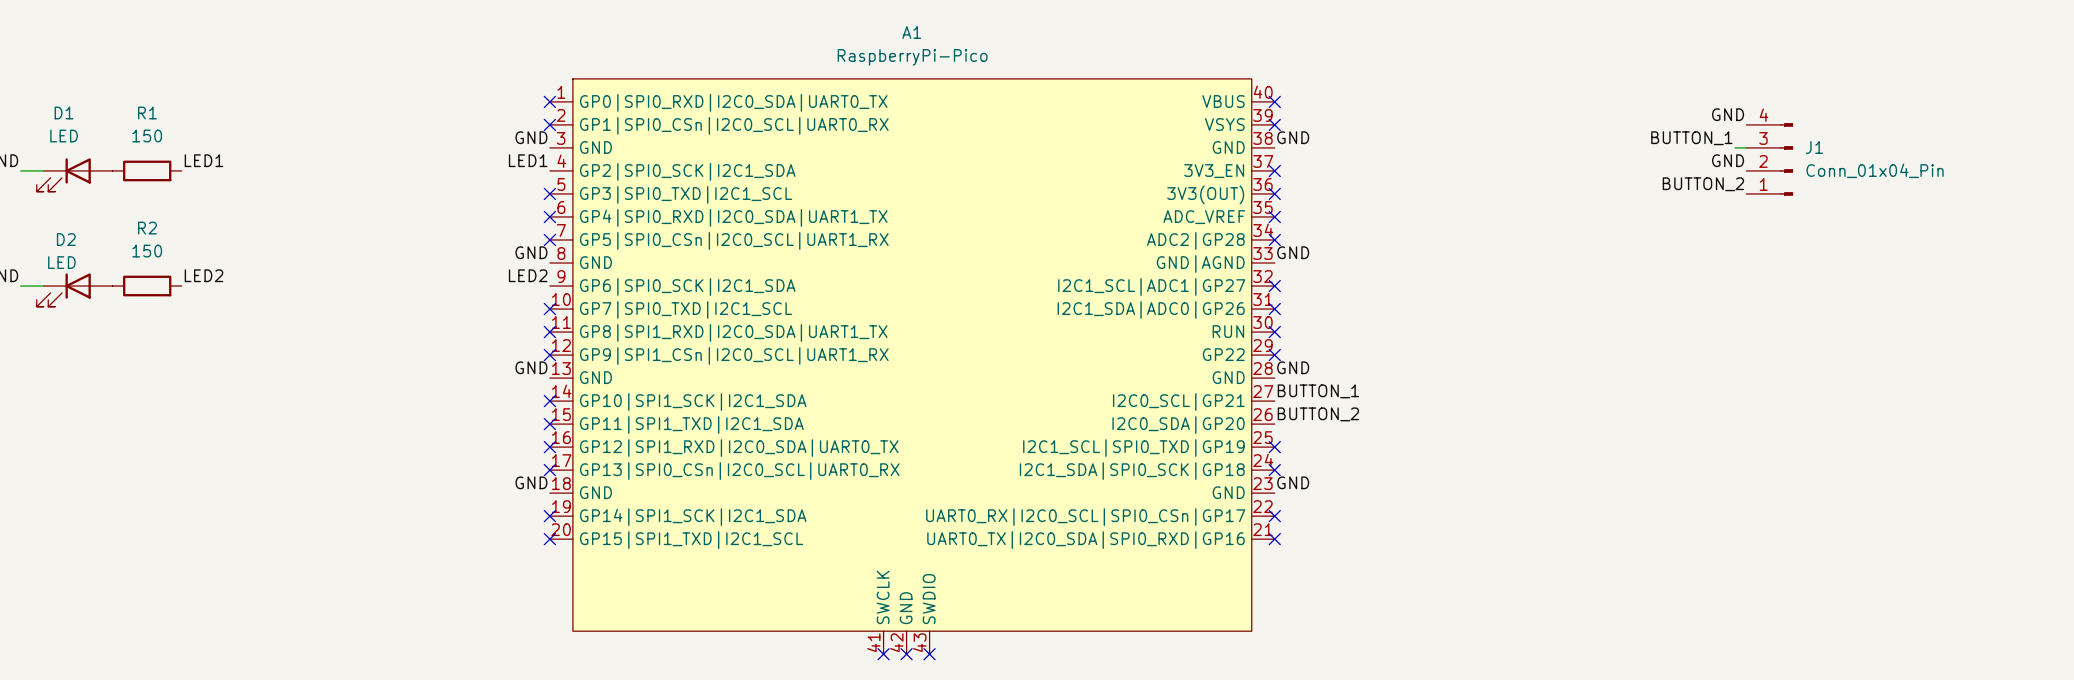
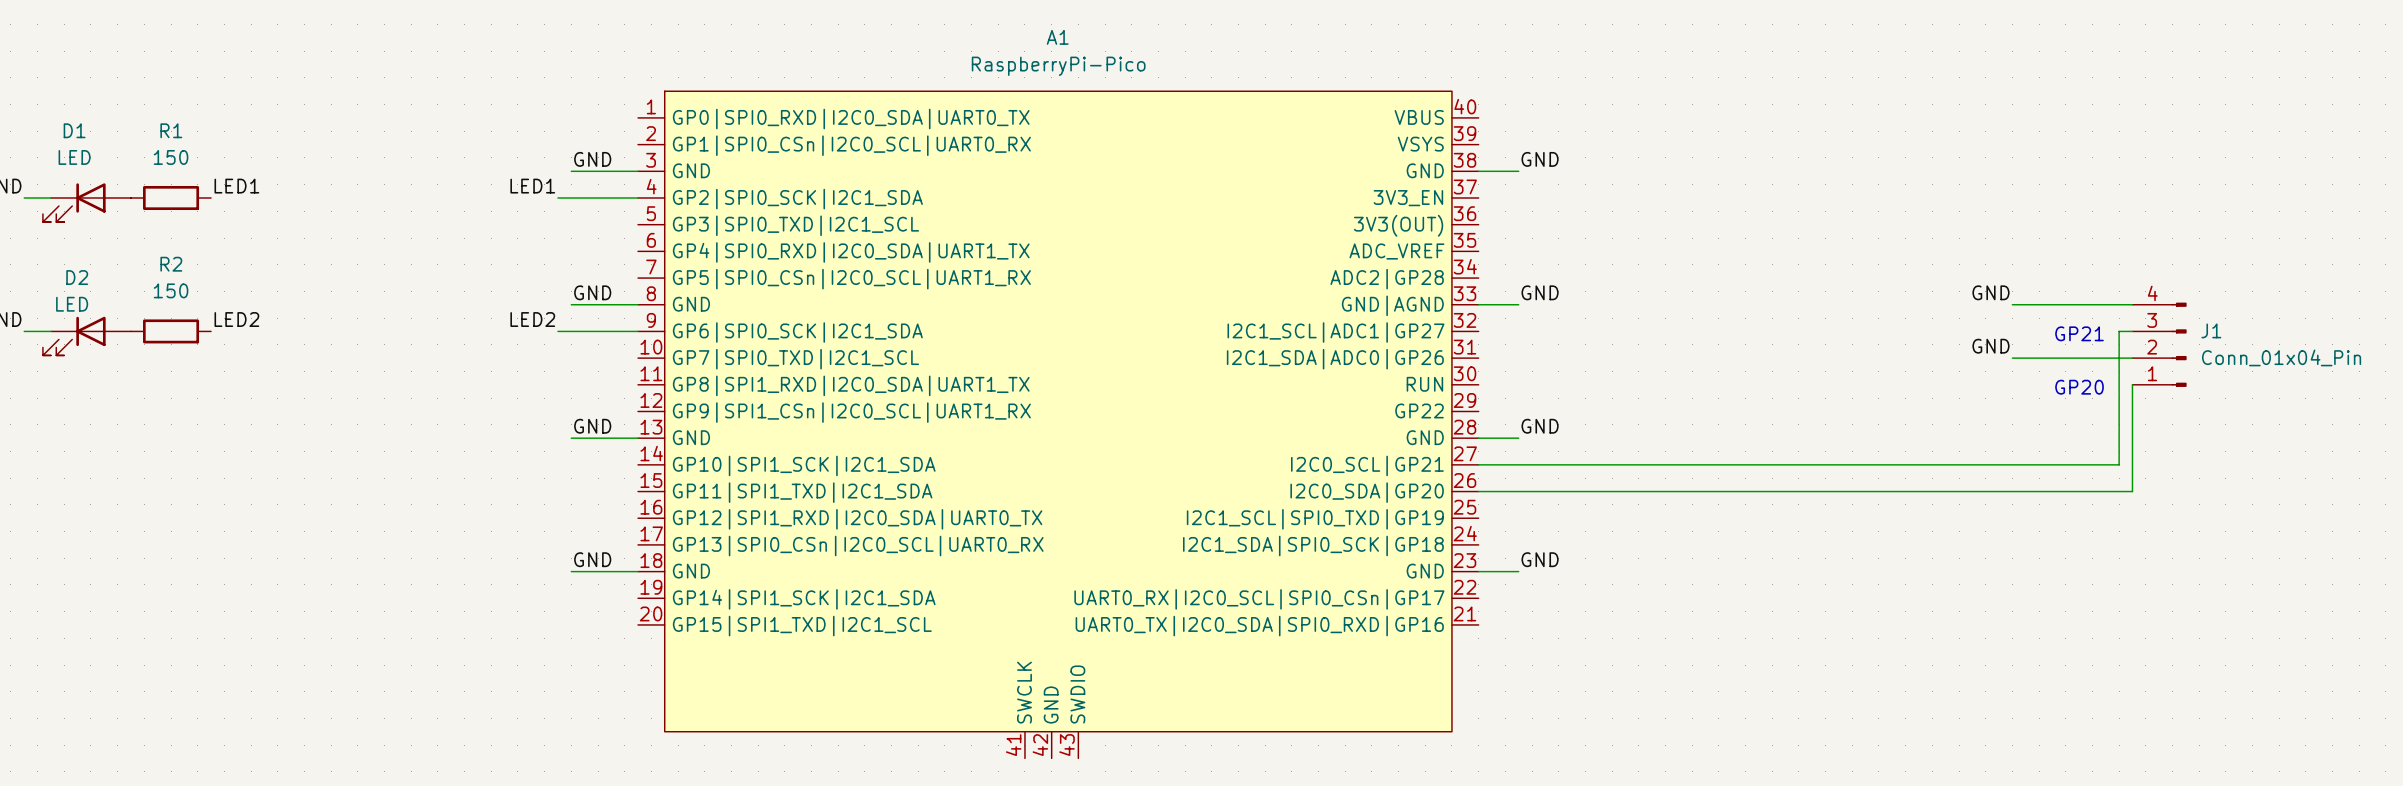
no-connect mark: (549, 101) -> none
no-connect mark: (1274, 101) -> none
label: GND (1728, 114) -> none
no-connect mark: (549, 124) -> none
no-connect mark: (1274, 124) -> none
label position: GND (531, 137) -> GND (592, 159)
label position: GND (1293, 137) -> GND (1540, 159)
label: BUTTON_1 (1691, 138) -> none
wire: none -> (571, 171) (638, 171)
wire: none -> (1478, 171) (1518, 171)
wire: (1734, 147) (1746, 147) -> none
J1 position: (1769, 159) -> (2159, 344)
label position: LED1 (528, 160) -> LED1 (532, 186)
label: GND (1728, 160) -> none
wire: none -> (557, 197) (638, 197)
no-connect mark: (1274, 170) -> none
label: BUTTON_2 (1703, 184) -> none
no-connect mark: (549, 193) -> none
no-connect mark: (1274, 193) -> none
no-connect mark: (549, 216) -> none
no-connect mark: (1274, 216) -> none
no-connect mark: (549, 239) -> none
no-connect mark: (1274, 239) -> none
label position: GND (531, 252) -> GND (592, 292)
label position: GND (1293, 252) -> GND (1540, 292)
label: none -> GND (1990, 292)
wire: none -> (571, 304) (638, 304)
wire: none -> (1478, 304) (1518, 304)
wire: none -> (2012, 304) (2132, 304)
label position: LED2 (528, 275) -> LED2 (532, 319)
wire: none -> (557, 331) (638, 331)
no-connect mark: (1274, 286) -> none
wire: none -> (2132, 331) (2119, 331) (2119, 464) (1478, 464)
text: none -> GP21 (2079, 333)
label: none -> GND (1990, 346)
no-connect mark: (549, 309) -> none
no-connect mark: (1274, 309) -> none
wire: none -> (2012, 358) (2132, 358)
no-connect mark: (549, 332) -> none
no-connect mark: (1274, 332) -> none
wire: none -> (2132, 384) (2132, 491) (1478, 491)
text: none -> GP20 (2079, 387)
no-connect mark: (549, 355) -> none
no-connect mark: (1274, 355) -> none
label position: GND (531, 367) -> GND (592, 426)
label position: GND (1293, 367) -> GND (1540, 426)
wire: none -> (571, 438) (638, 438)
wire: none -> (1478, 438) (1518, 438)
label: BUTTON_1 (1318, 391) -> none
no-connect mark: (549, 401) -> none
label: BUTTON_2 (1318, 414) -> none
no-connect mark: (549, 424) -> none
no-connect mark: (549, 447) -> none
no-connect mark: (1274, 447) -> none
no-connect mark: (549, 470) -> none
no-connect mark: (1274, 470) -> none
label position: GND (531, 482) -> GND (592, 559)
label position: GND (1293, 482) -> GND (1540, 559)
wire: none -> (571, 571) (638, 571)
wire: none -> (1478, 571) (1518, 571)
no-connect mark: (549, 516) -> none
no-connect mark: (1274, 516) -> none
no-connect mark: (549, 539) -> none
no-connect mark: (1274, 539) -> none
no-connect mark: (883, 654) -> none
no-connect mark: (906, 654) -> none
no-connect mark: (929, 654) -> none

